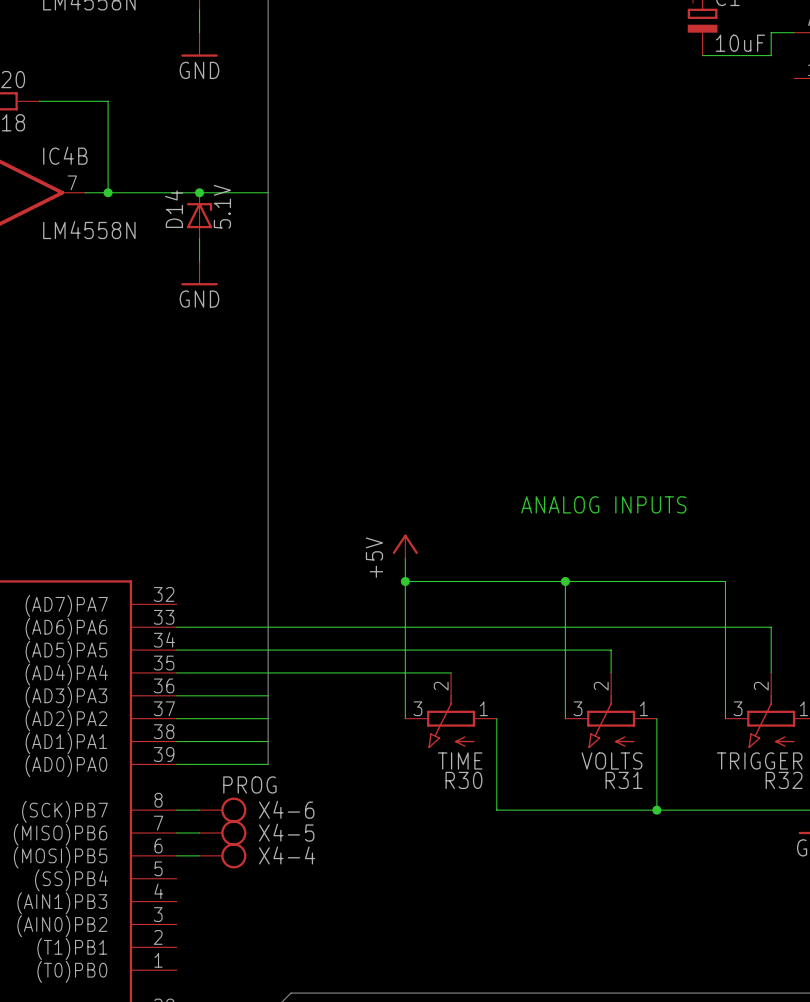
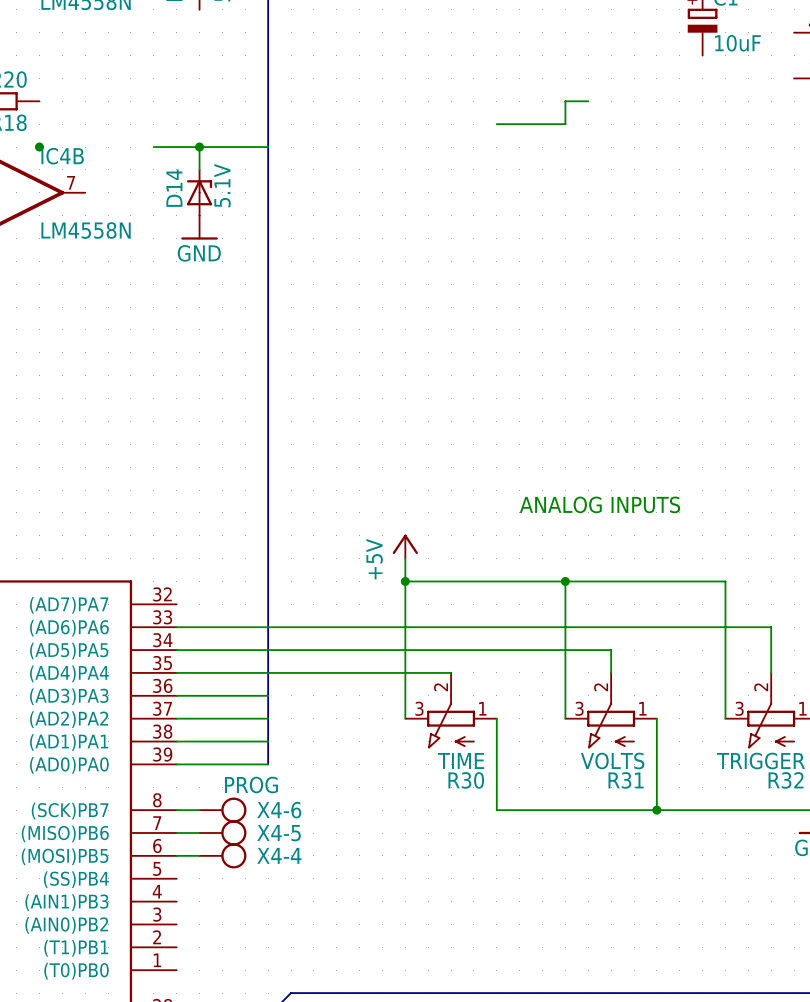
wire: (199, 9) (199, 32) -> none
wire: (794, 32) (771, 32) (771, 55) (702, 55) -> (588, 101) (565, 101) (565, 124) (496, 124)
power symbol: GND (199, 44) -> none
wire: (39, 101) (108, 101) (108, 192) -> none
junction: none -> (39, 147)
wire: none -> (153, 147) (268, 147)
wire: (85, 192) (268, 192) -> none
junction: (108, 192) -> none
junction position: (199, 192) -> (199, 147)
D14 position: (199, 215) -> (199, 192)
wire: (199, 238) (199, 261) -> (199, 147) (199, 169)
power symbol position: GND (199, 273) -> GND (199, 227)

